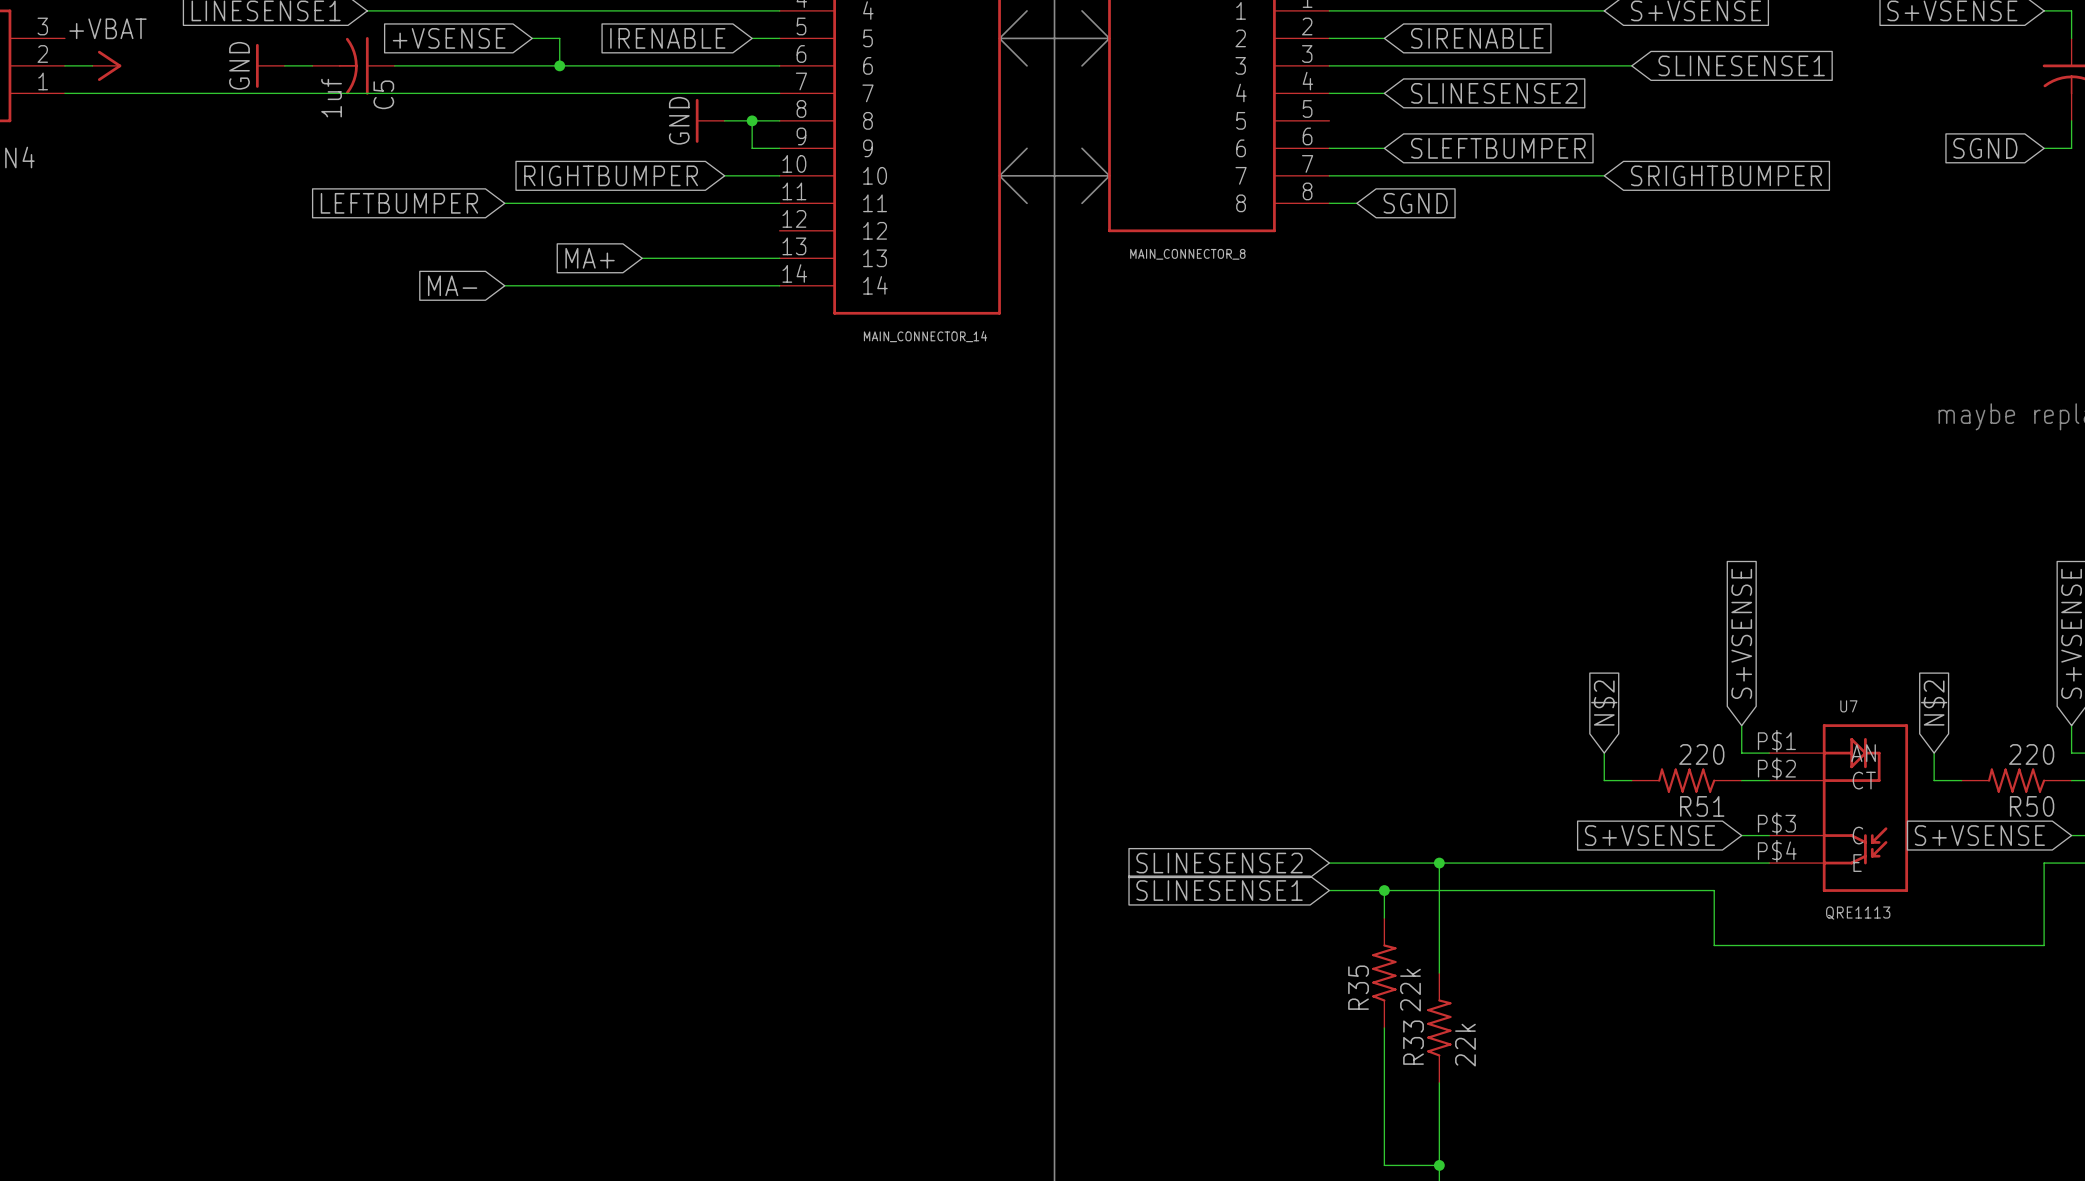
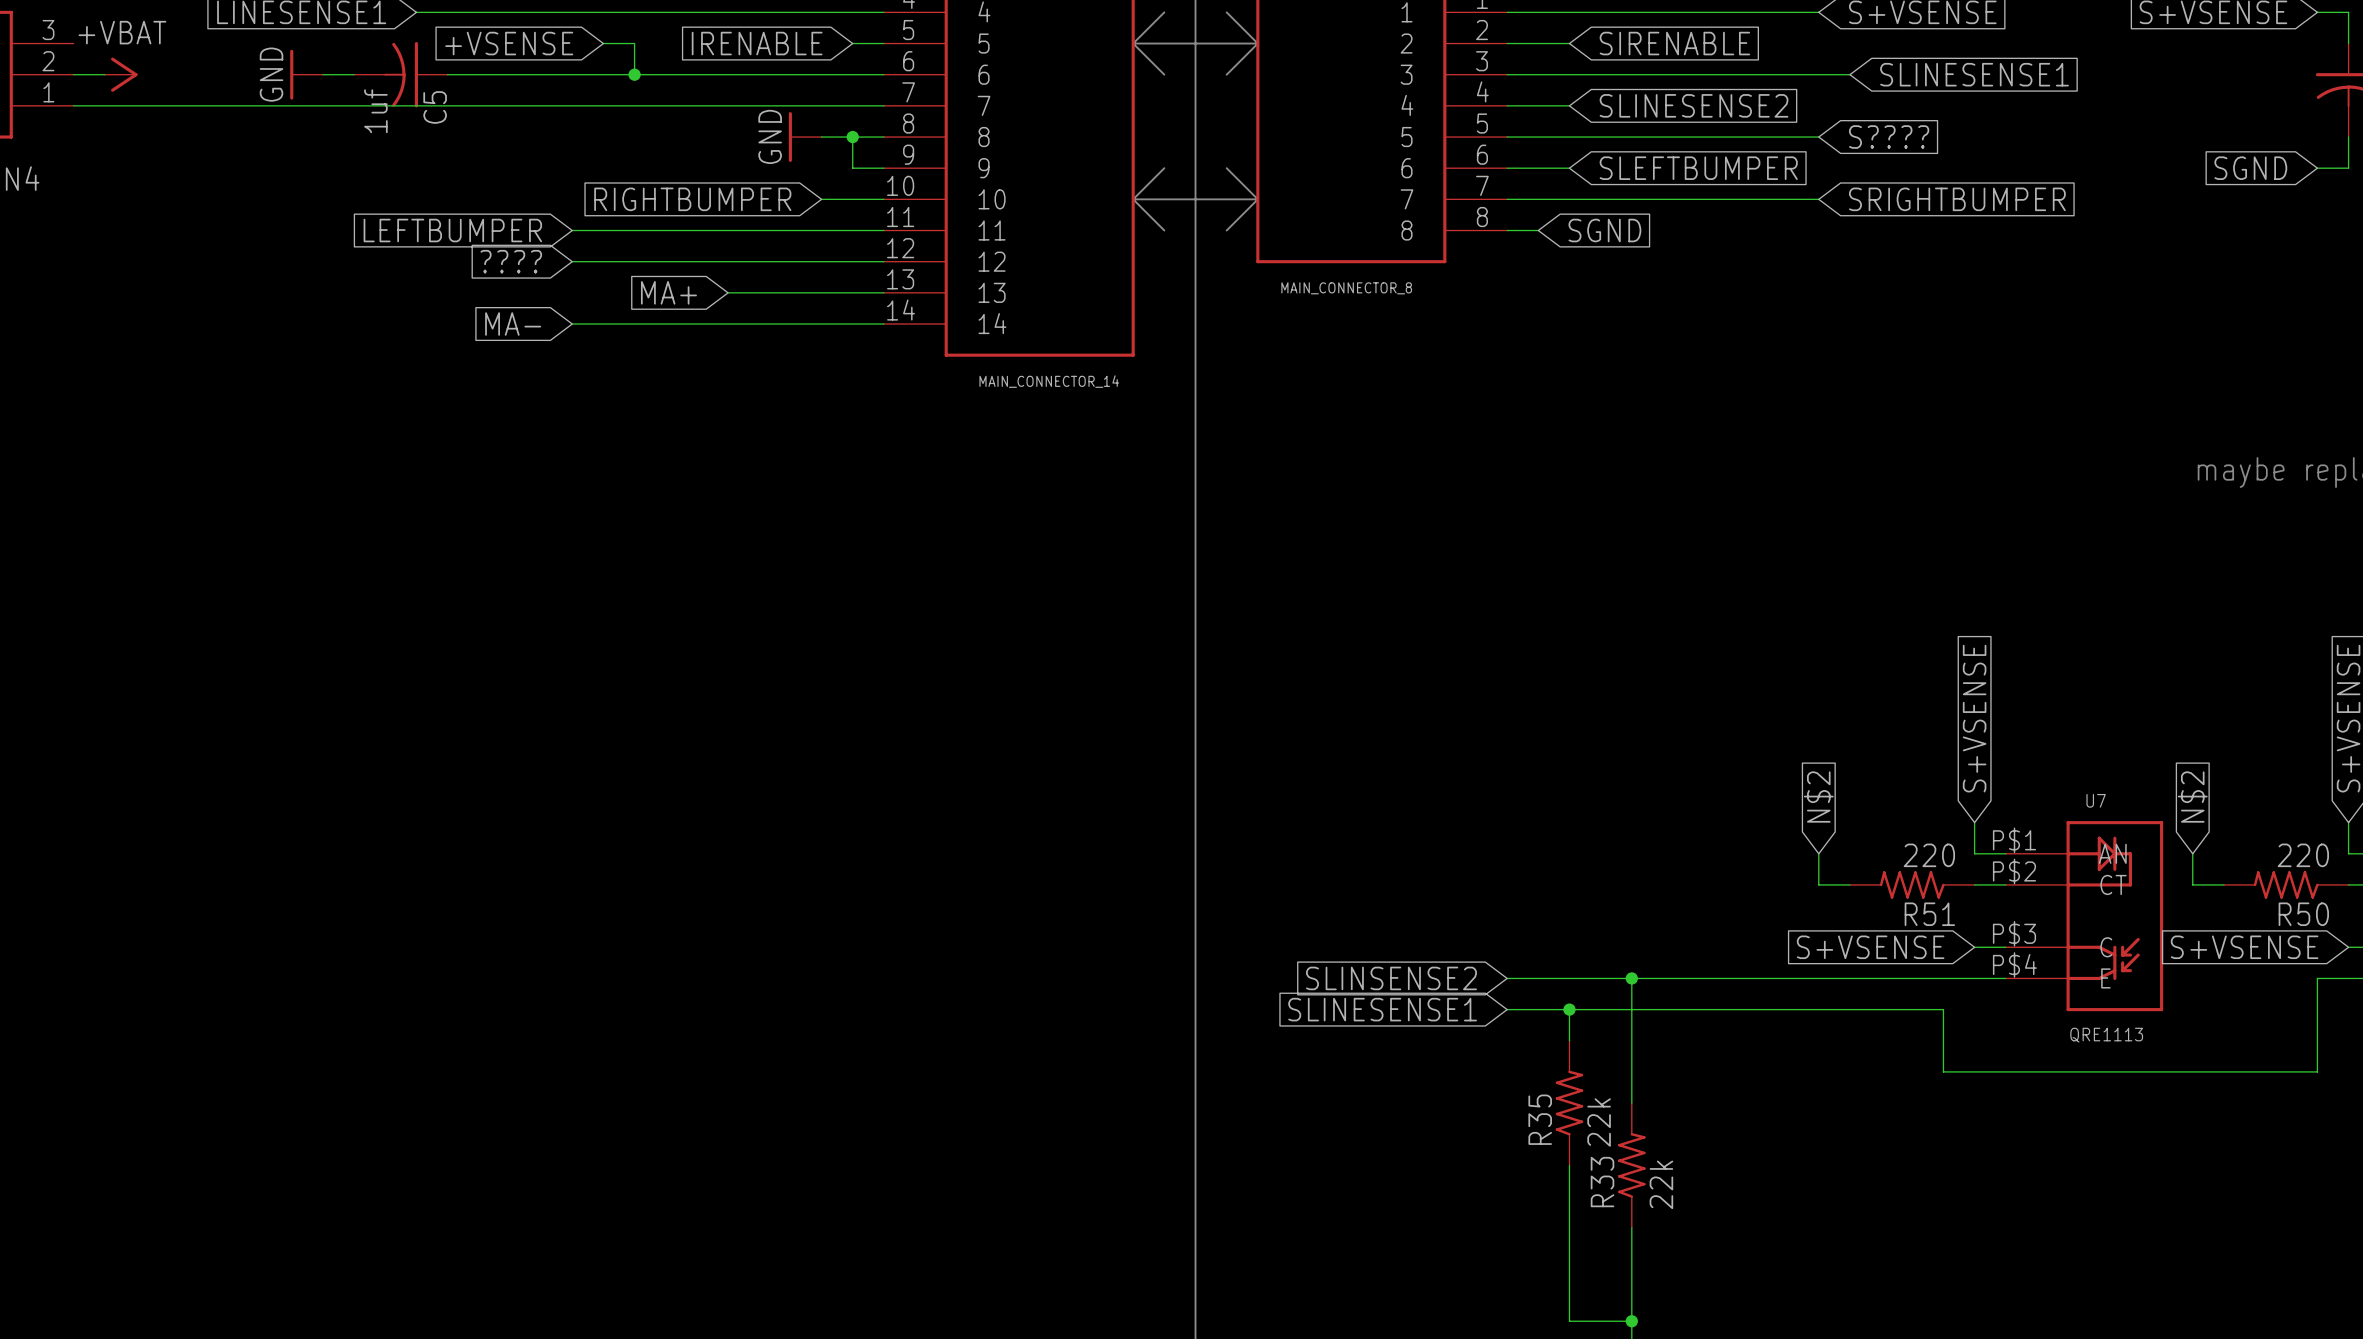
wire: none -> (1507, 137) (1818, 137)
global label: none -> S???? (1889, 137)
global label: none -> ???? (511, 261)
wire: none -> (572, 261) (883, 261)
global label: SLINESENSE2 (1219, 863) -> SLINSENSE2 (1391, 978)

